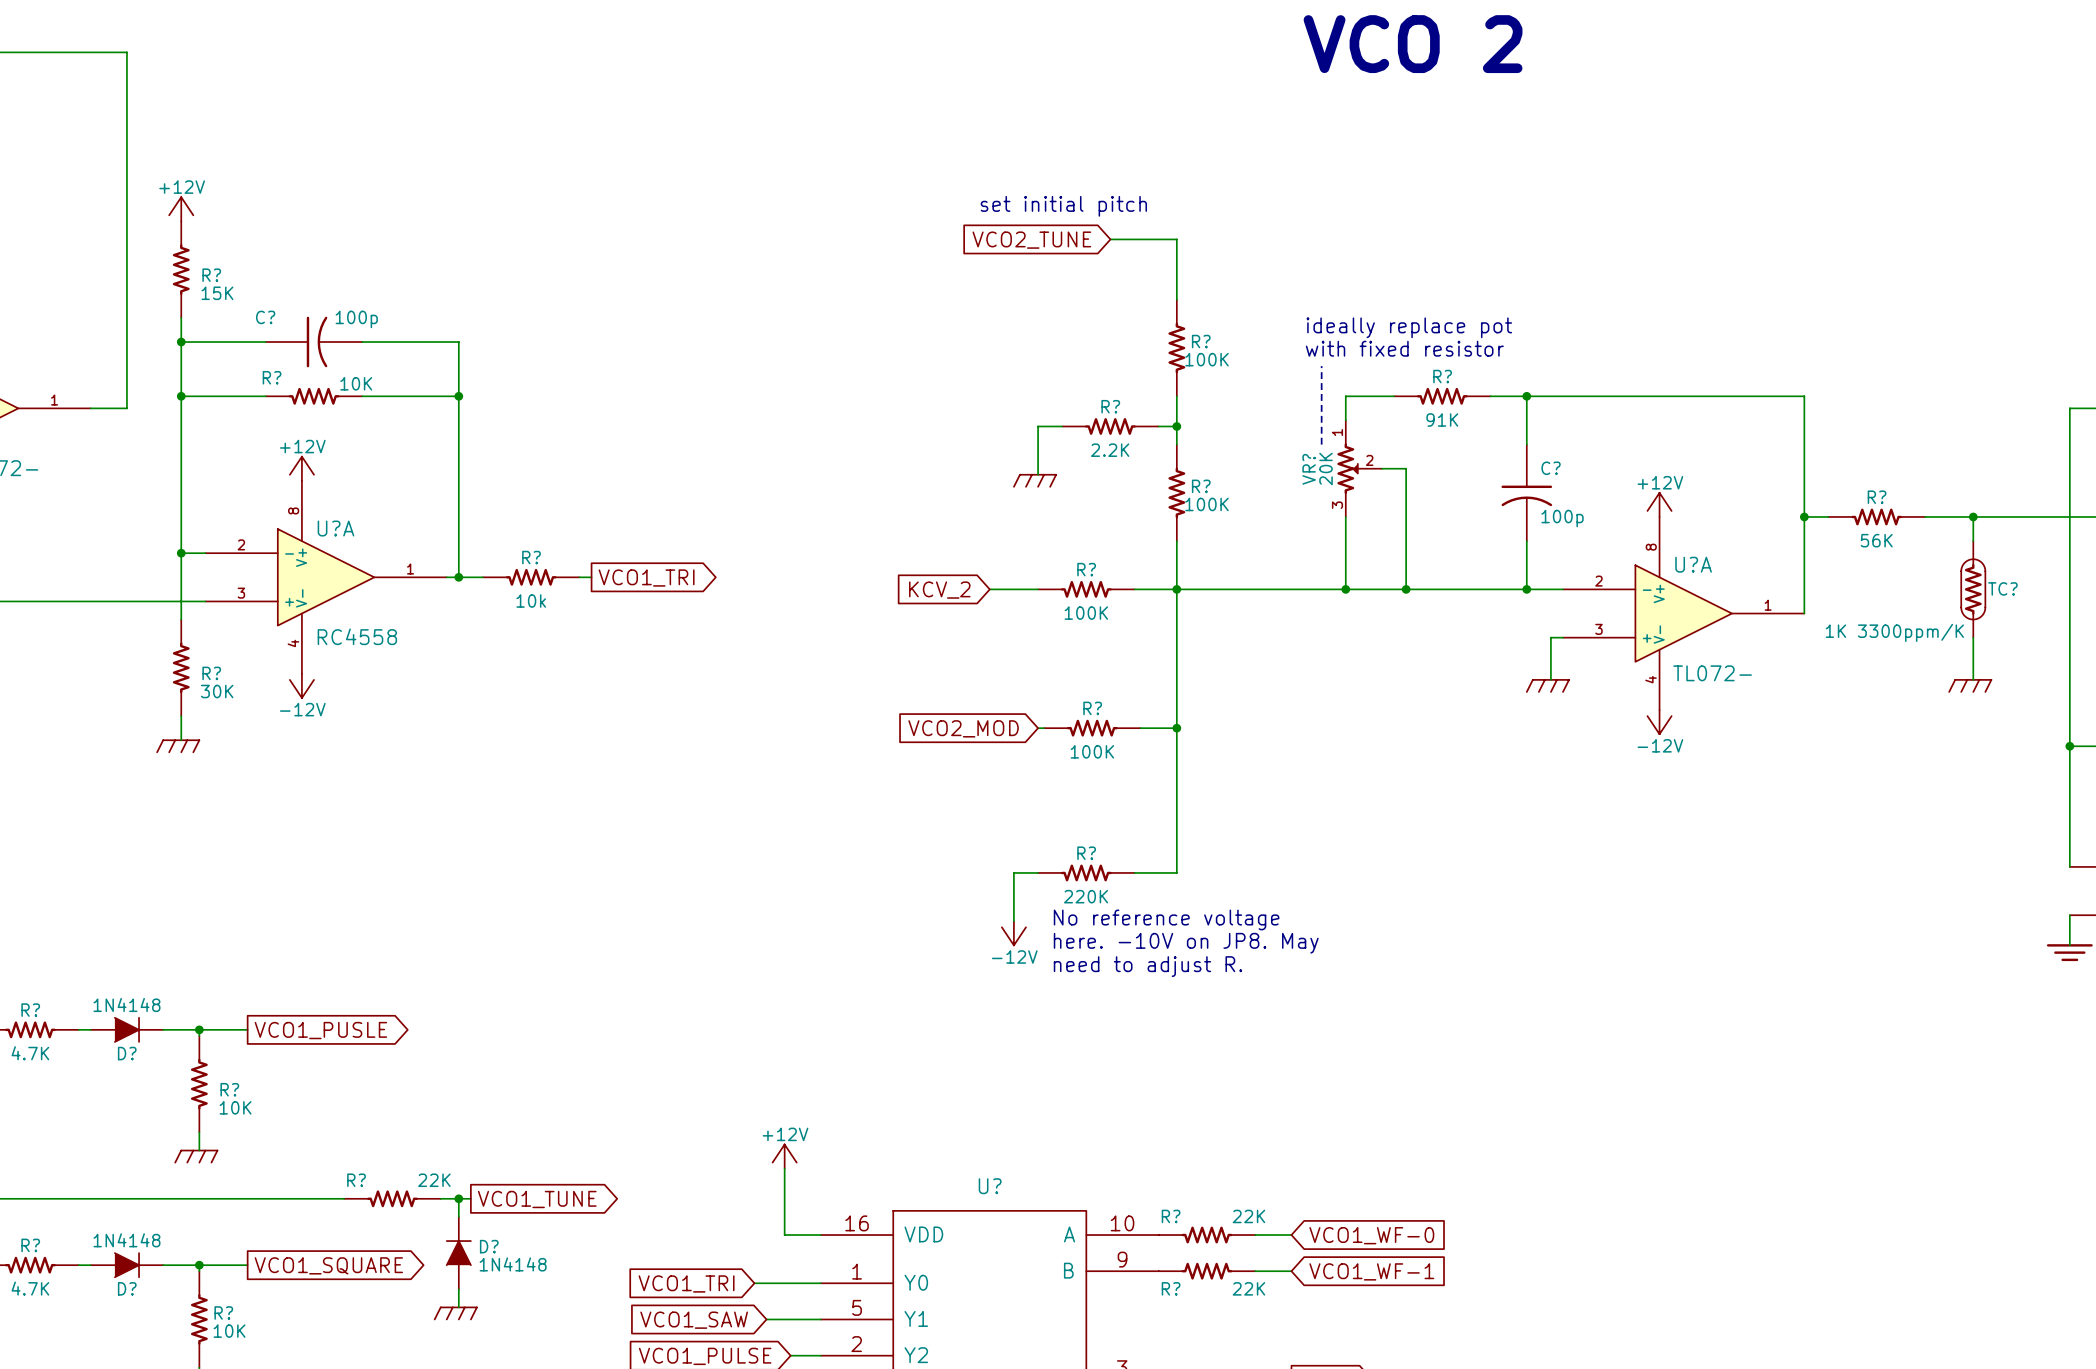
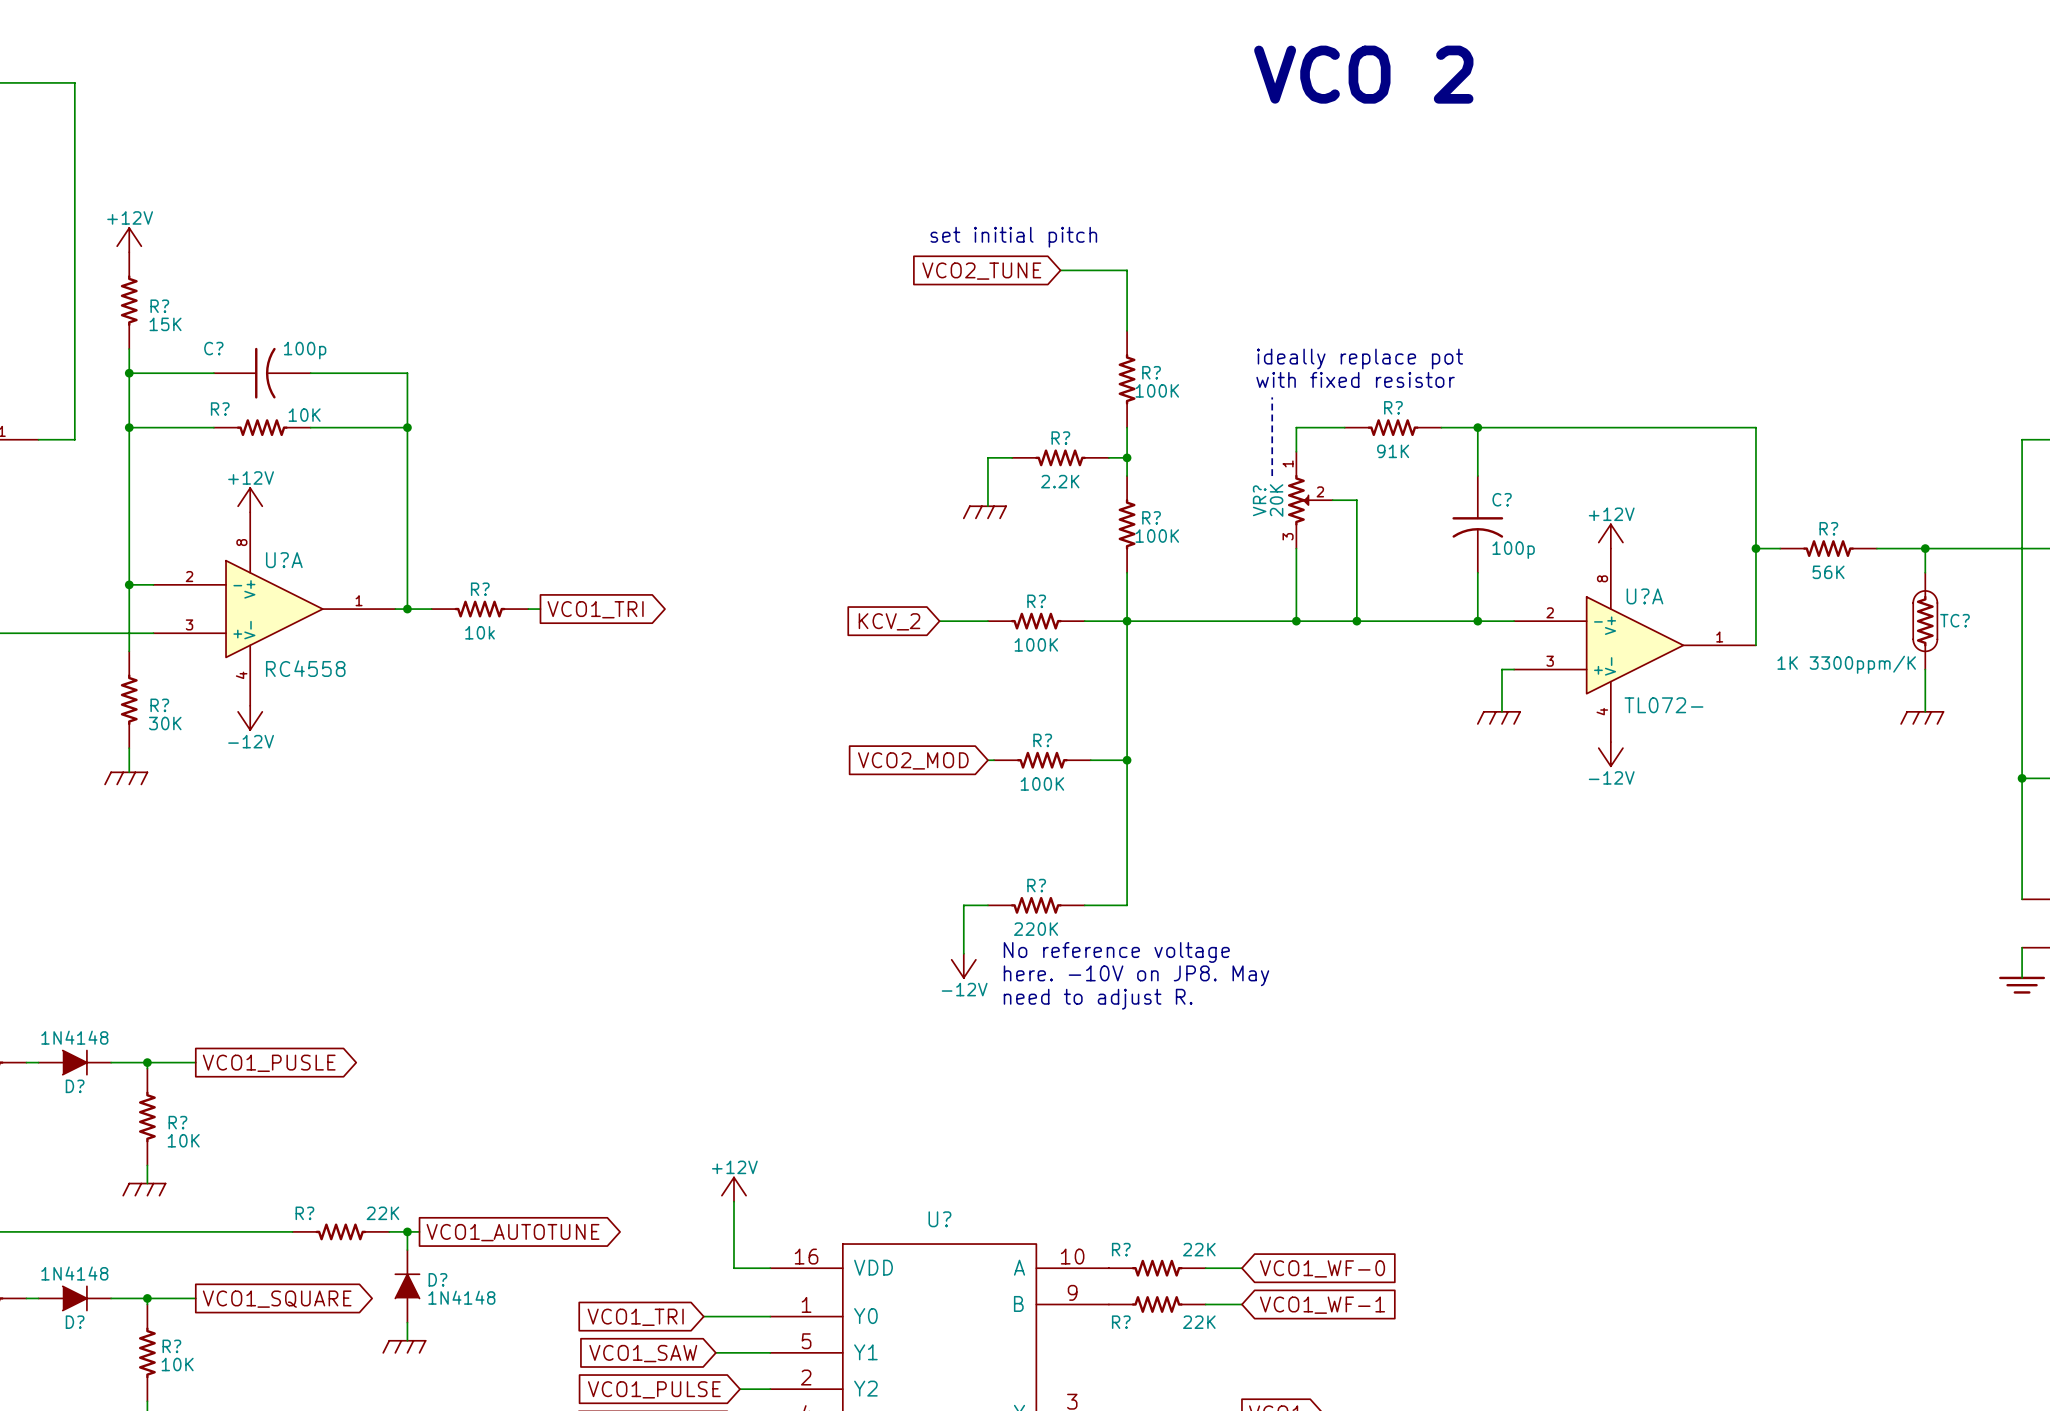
global label: VCO1_TUNE (537, 1199) -> VCO1_AUTOTUNE (513, 1232)

